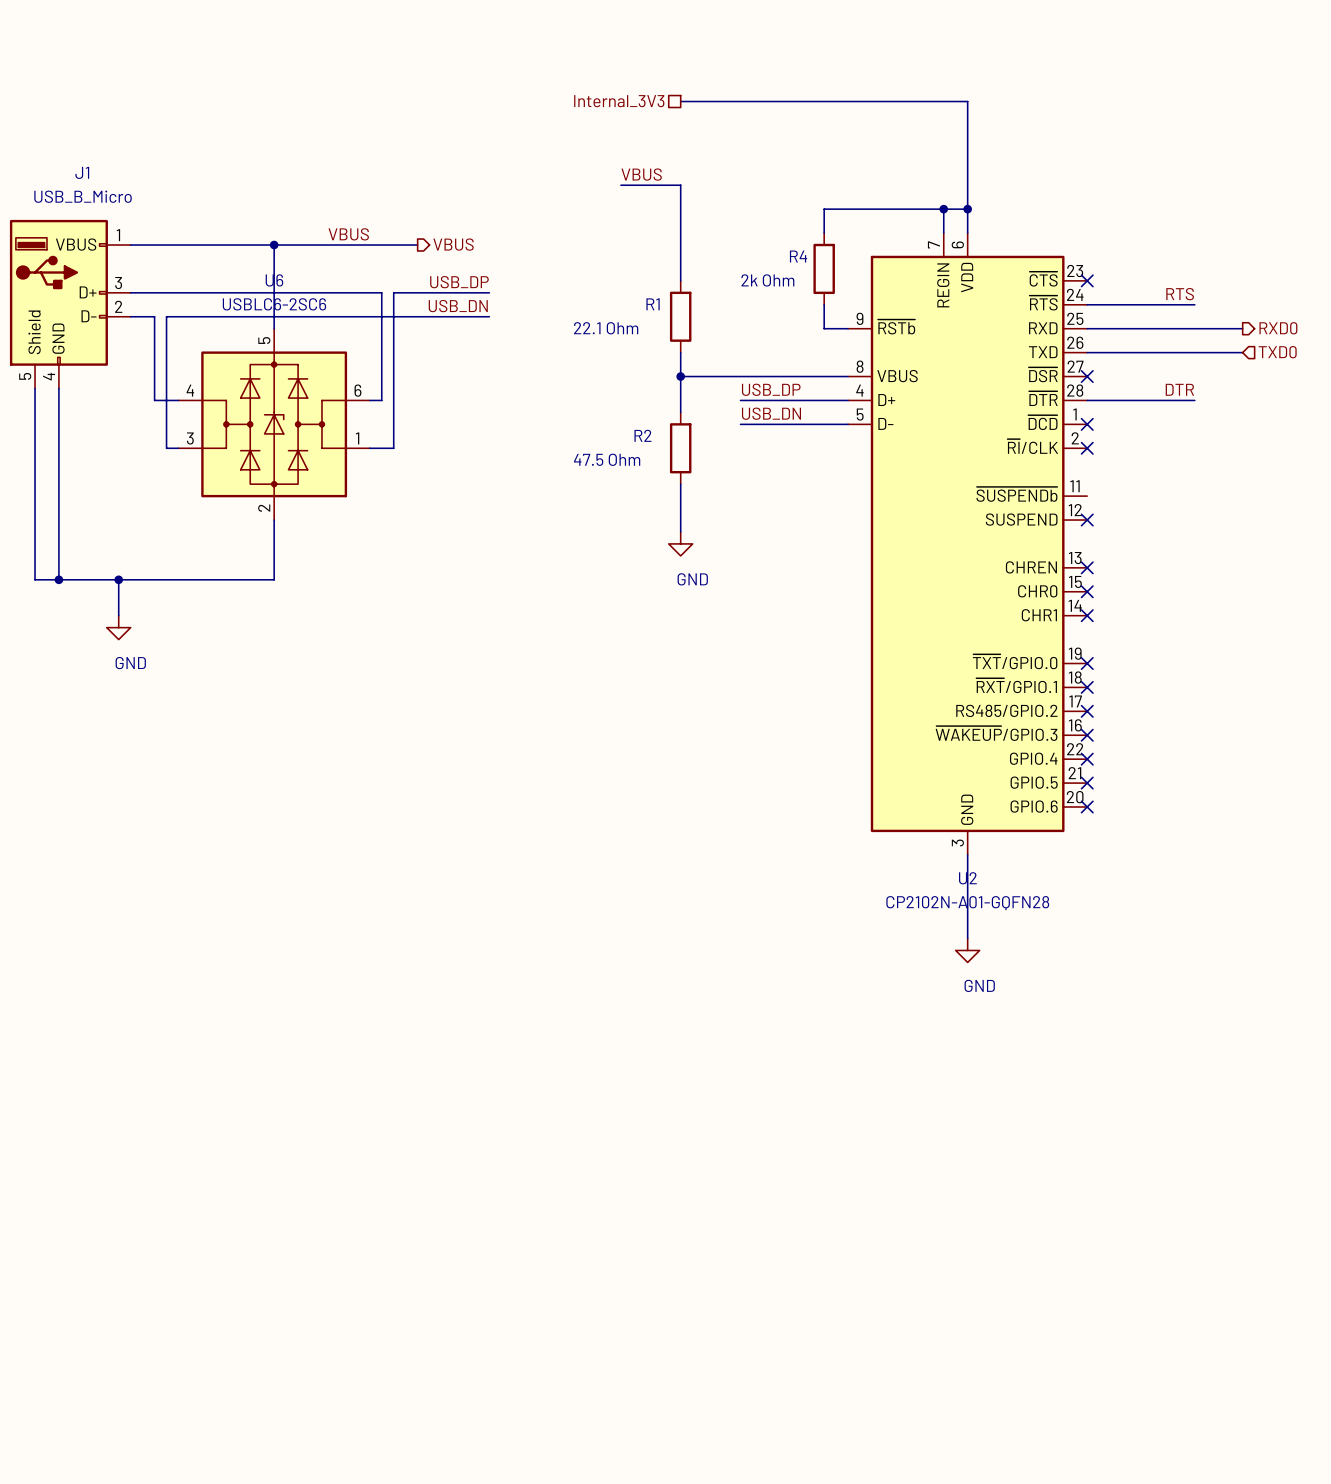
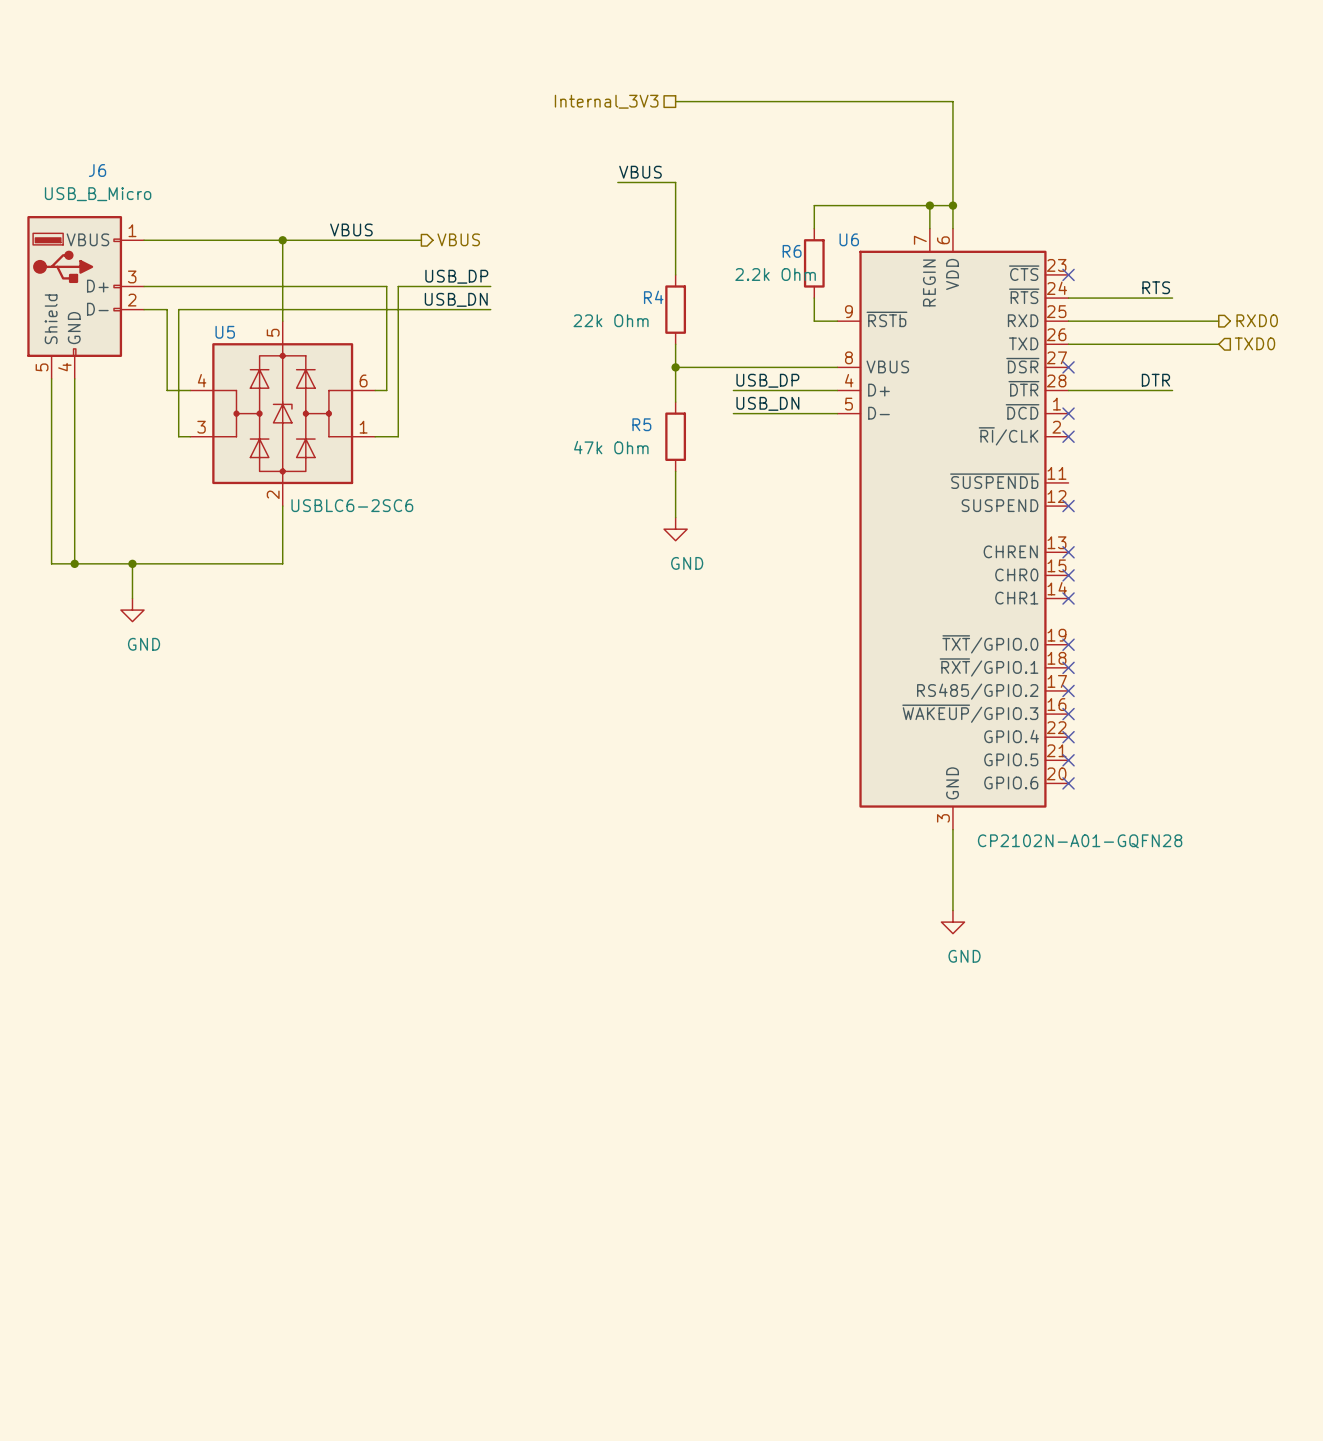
J1 name: J1 (82, 172) -> J6 (97, 170)
R4 name: R4 (798, 256) -> R6 (792, 251)
U6 name: U6 (274, 280) -> U5 (225, 332)
R4 value: 2k Ohm (767, 280) -> 2.2k Ohm (775, 274)
U6 value position: USBLC6-2SC6 (274, 304) -> USBLC6-2SC6 (352, 505)
R1 name: R1 (653, 304) -> R4 (653, 297)
R1 value: 22.1 Ohm (606, 328) -> 22k Ohm (611, 320)
R2 name: R2 (642, 435) -> R5 (641, 424)
R2 value: 47.5 Ohm (607, 459) -> 47k Ohm (611, 447)
U2 name: U2 (967, 878) -> U6 (849, 239)
U2 value position: CP2102N-A01-GQFN28 (967, 903) -> CP2102N-A01-GQFN28 (1080, 841)

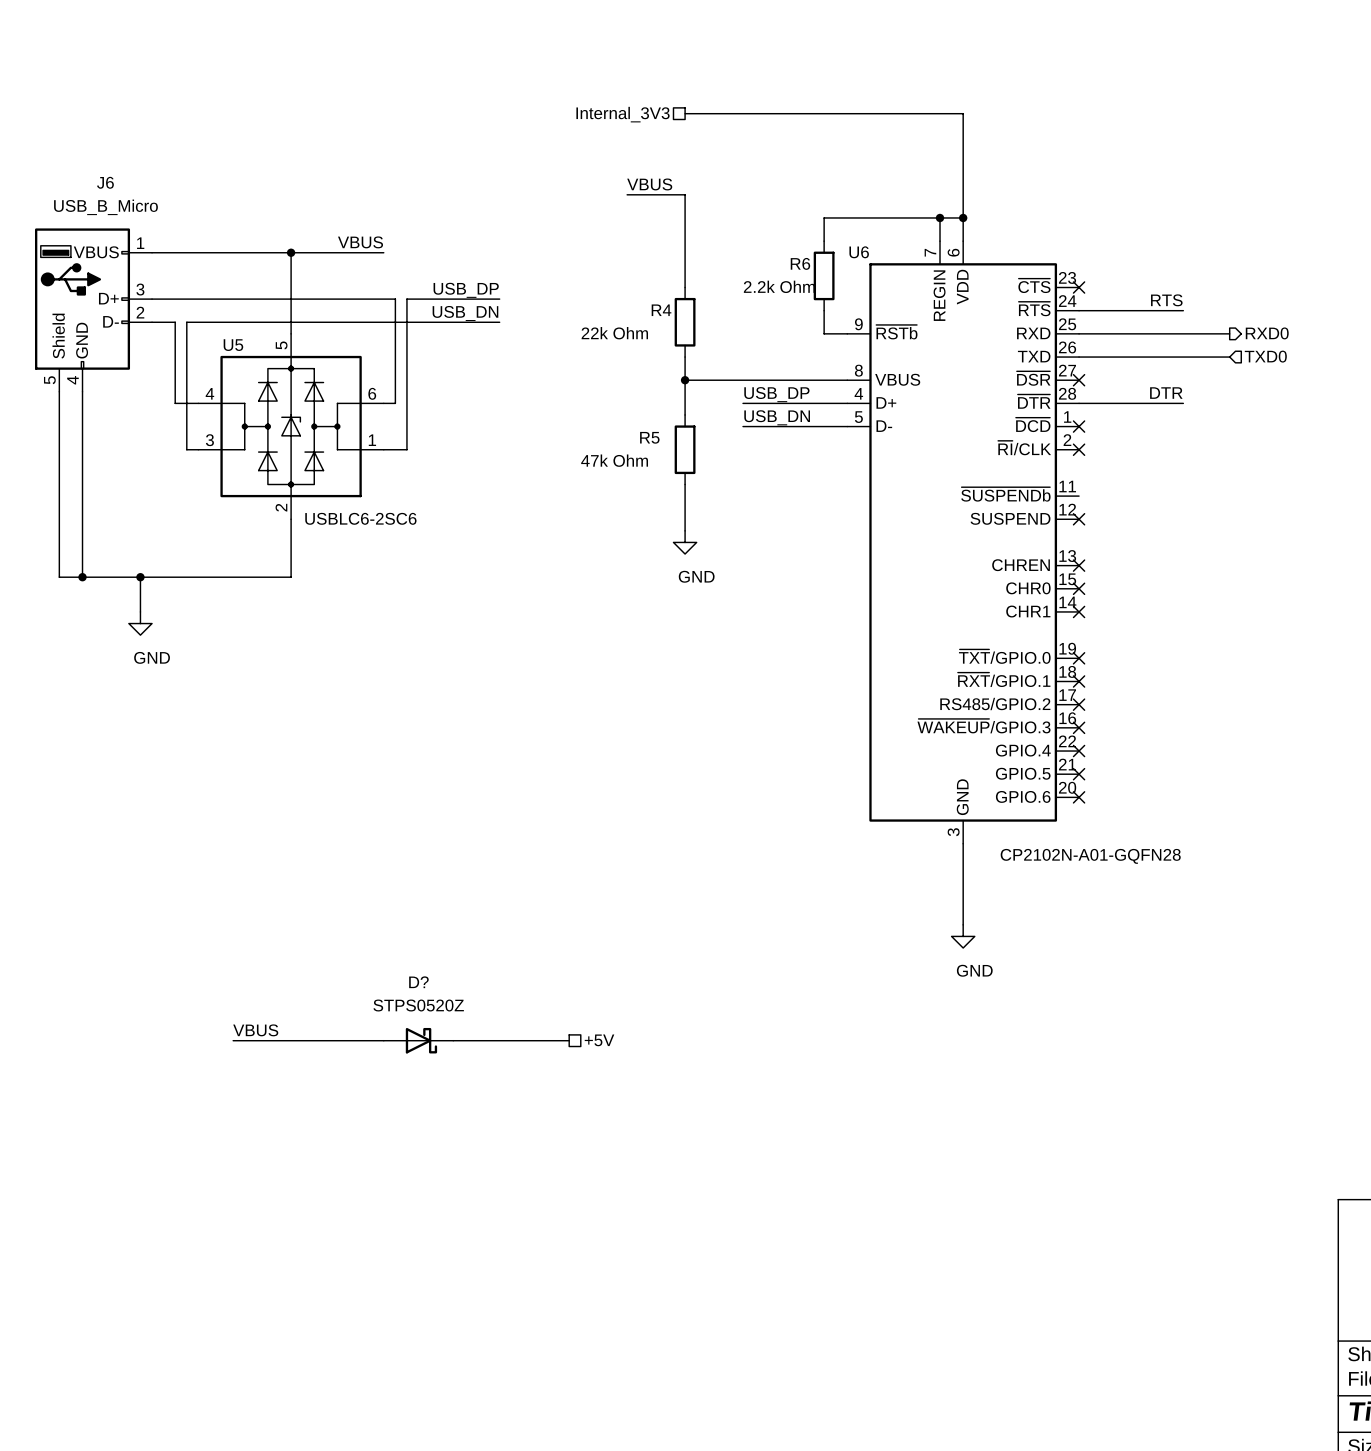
hierarchical label: VBUS (458, 239) -> none
wire: (375, 240) (421, 240) -> none
label: none -> VBUS (255, 1030)
hierarchical label: none -> +5V (599, 1040)
wire: none -> (233, 1040) (383, 1040)
D?: none -> STPS0520Z (418, 1040)
wire: none -> (453, 1040) (569, 1040)

